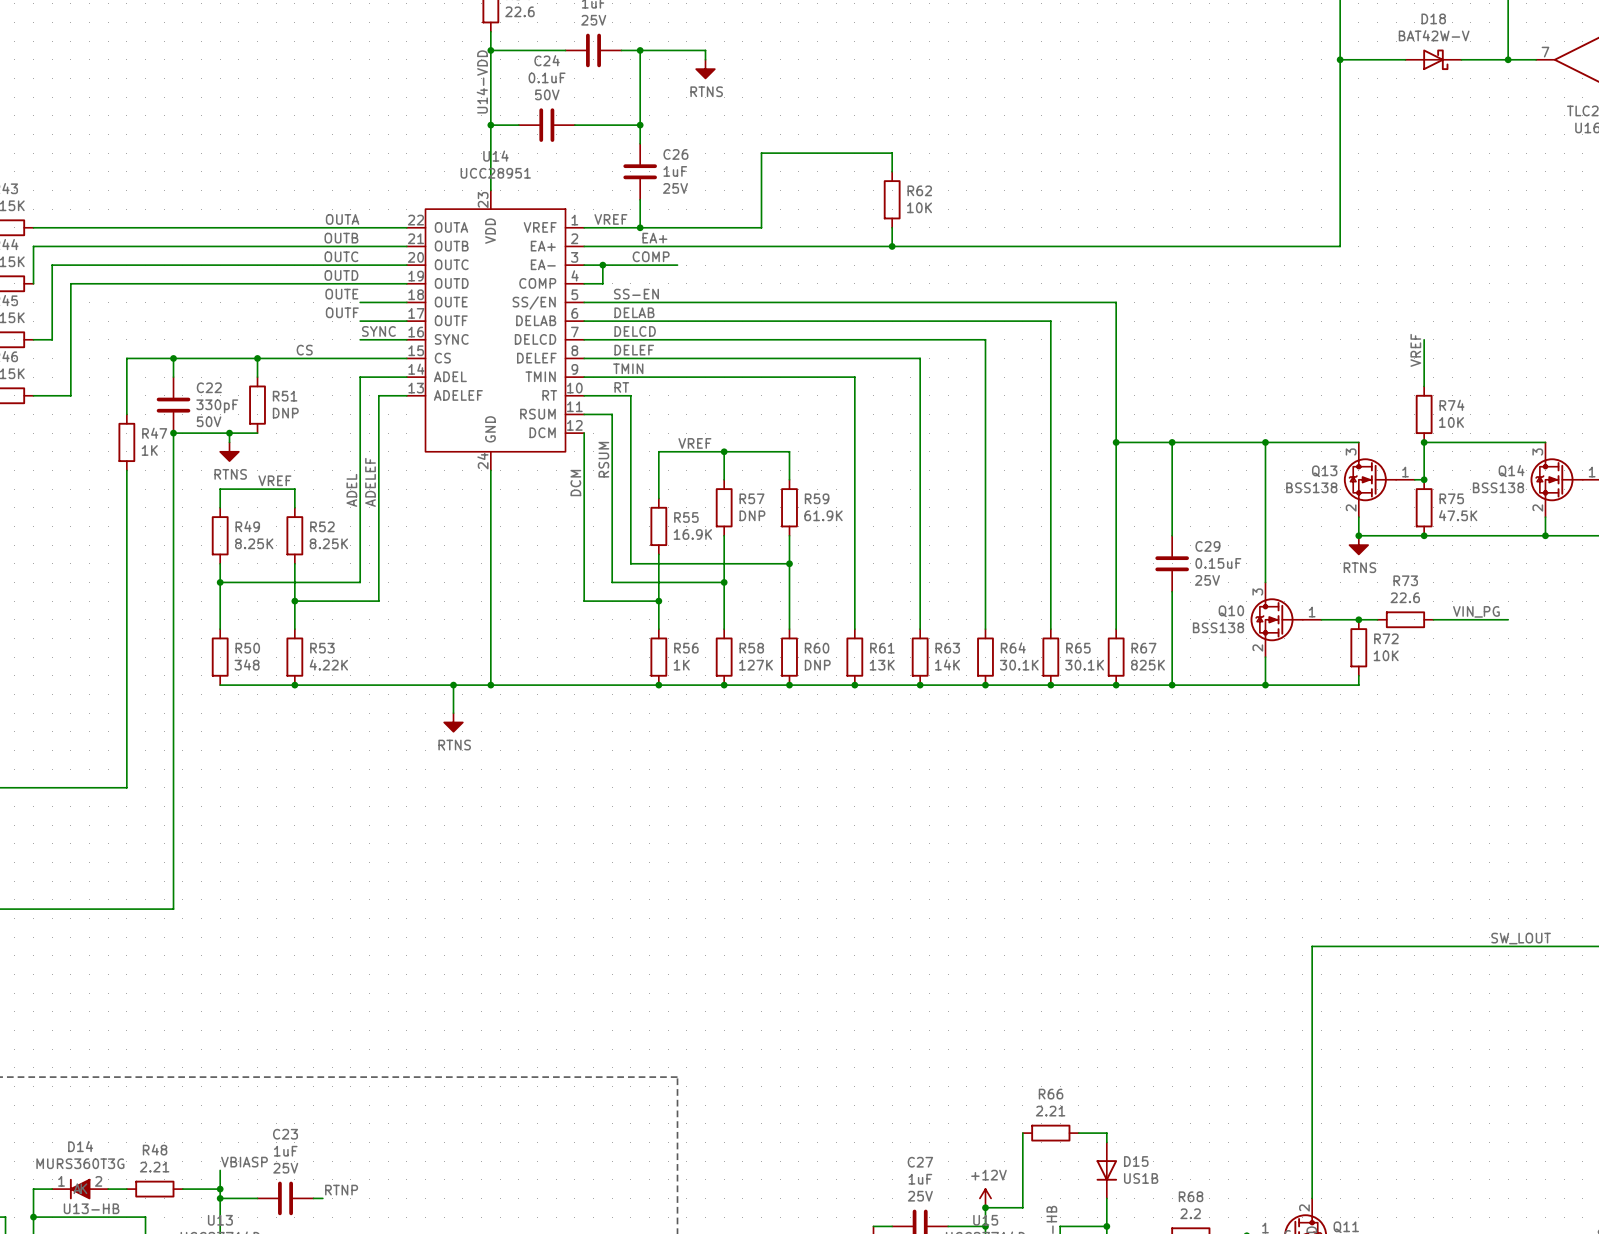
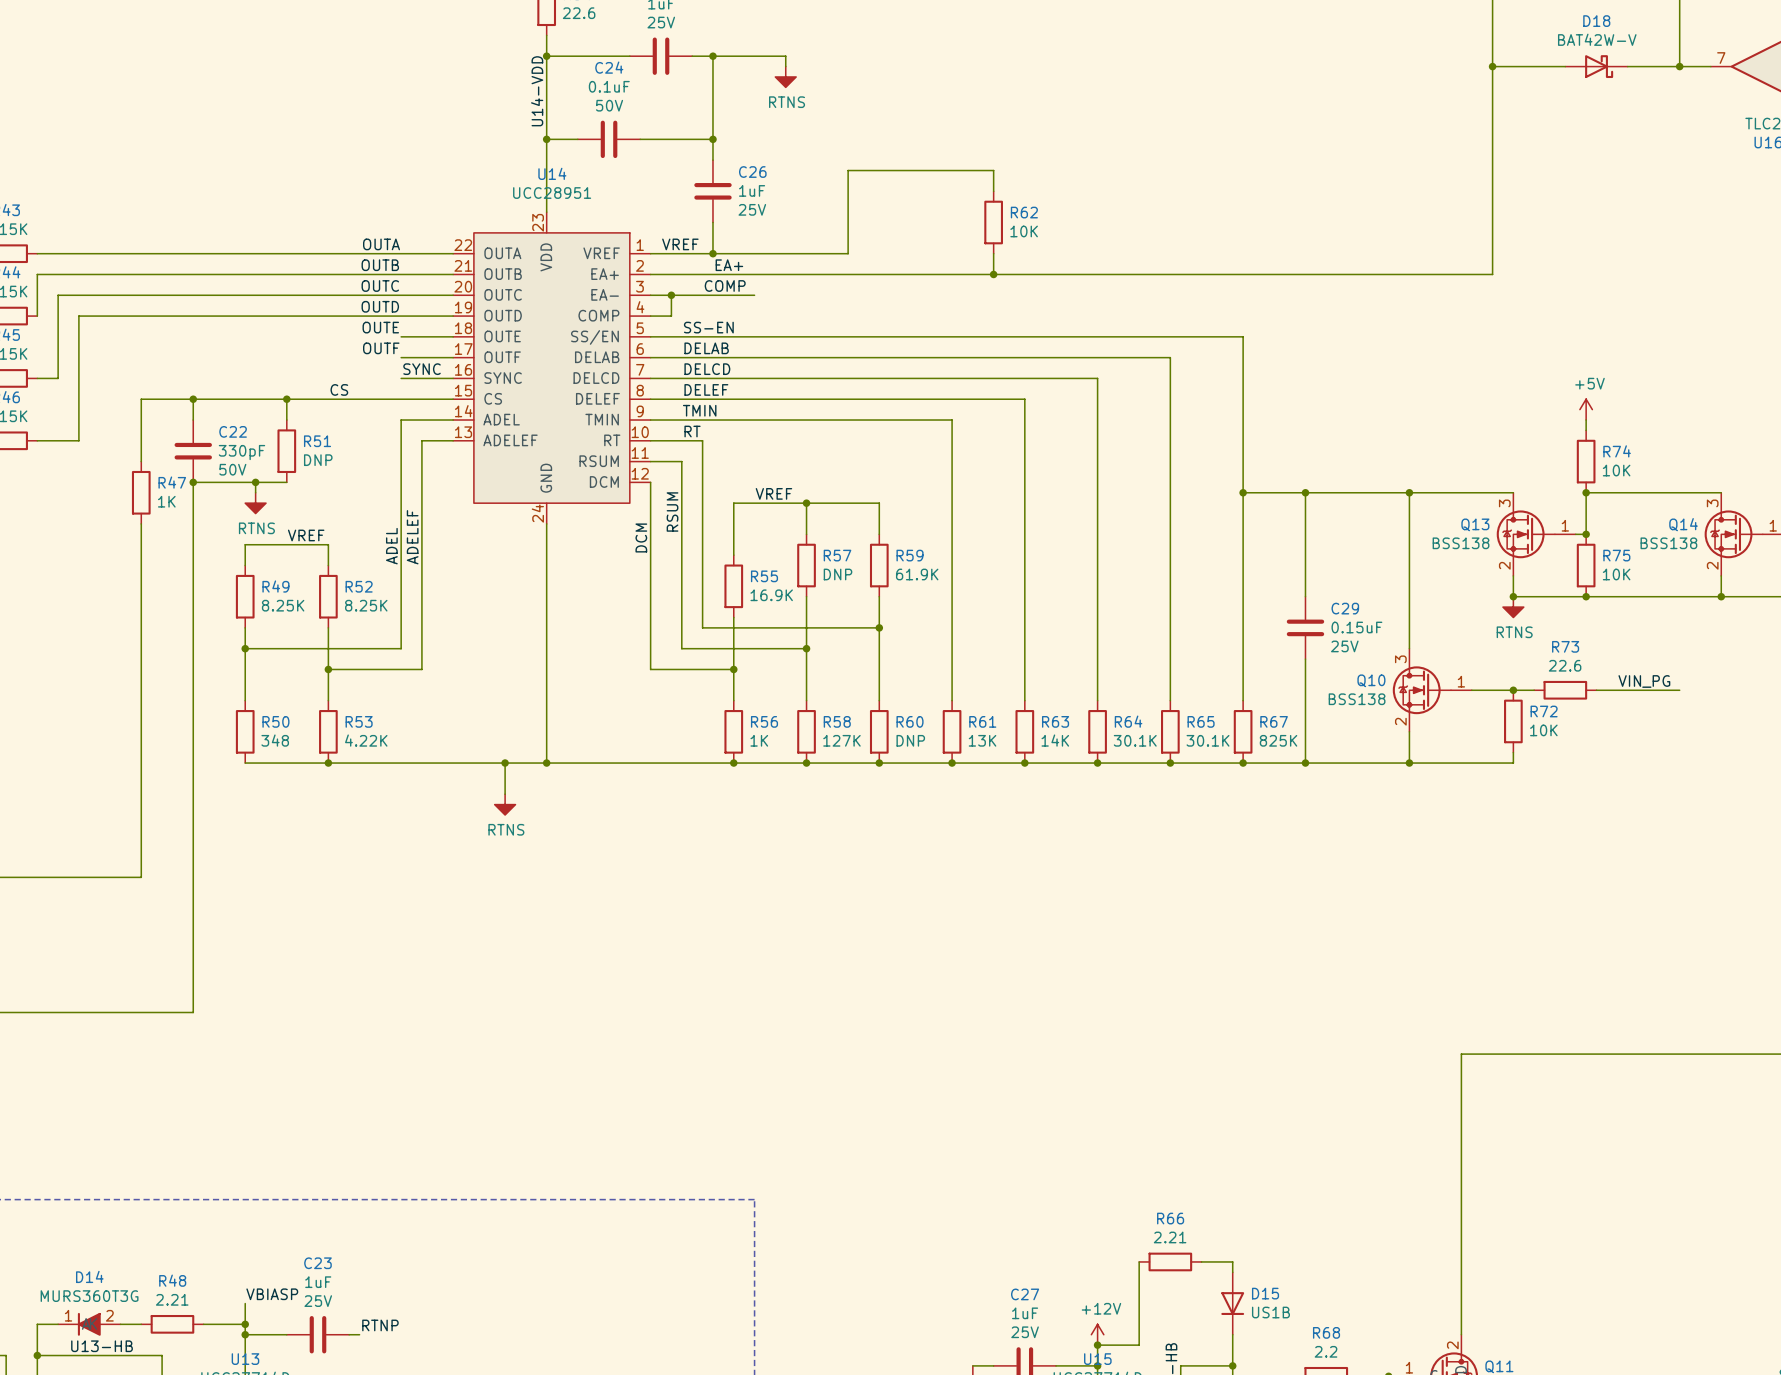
label: VREF (1415, 350) -> none
power symbol: none -> +5V (1586, 409)
R75 text: 47.5K (1458, 515) -> 10K (1616, 574)
label: SW_LOUT (1521, 938) -> none

